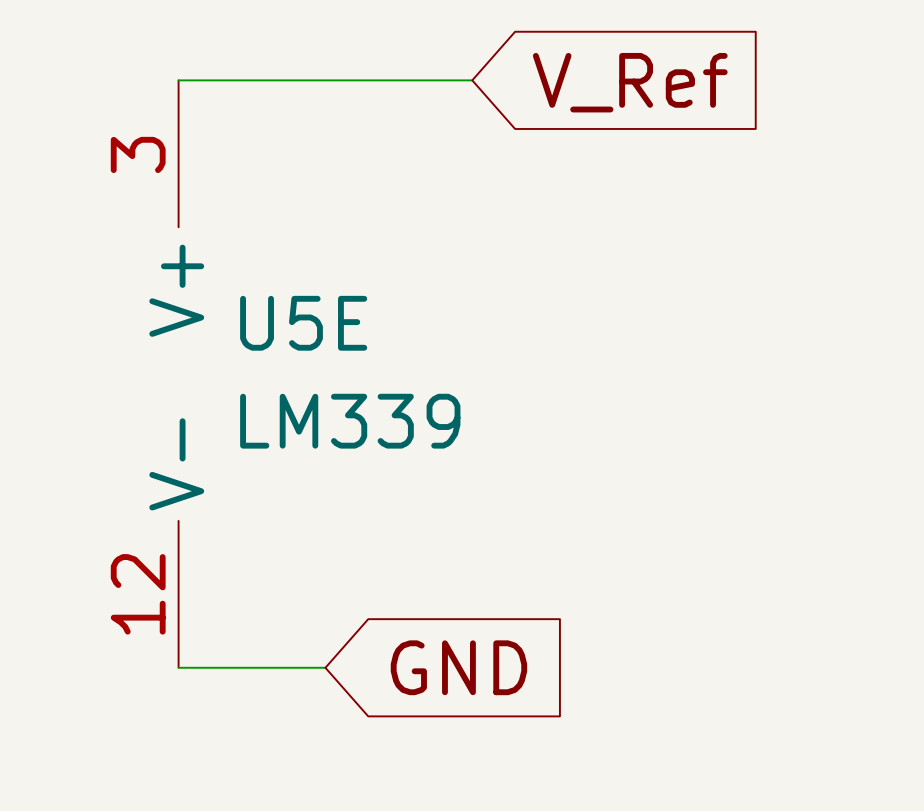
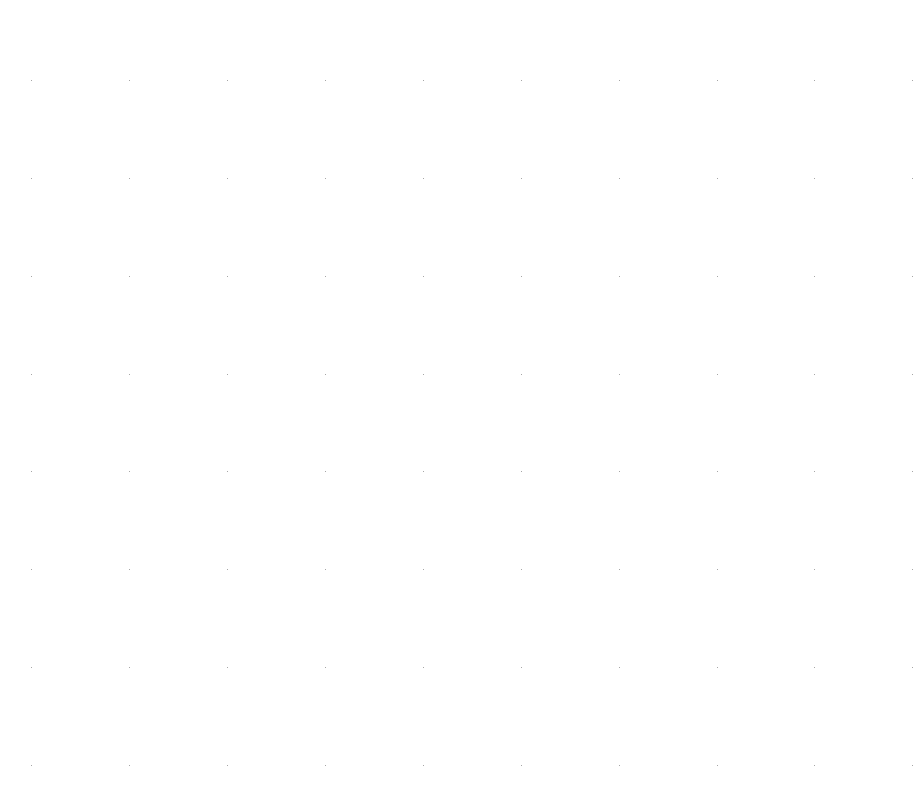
wire: (178, 80) (472, 80) -> none
global label: V_Ref (630, 82) -> none
U5E: LM339 (178, 374) -> none
wire: (178, 667) (325, 667) -> none
global label: GND (458, 667) -> none

